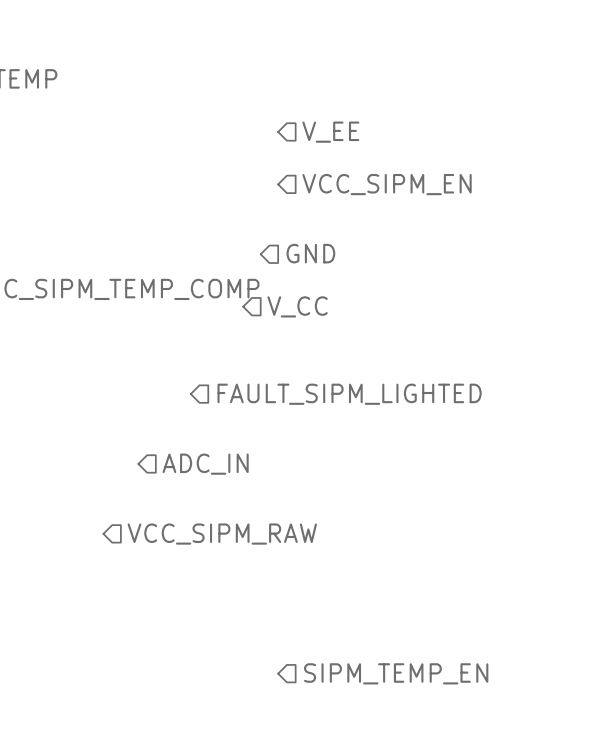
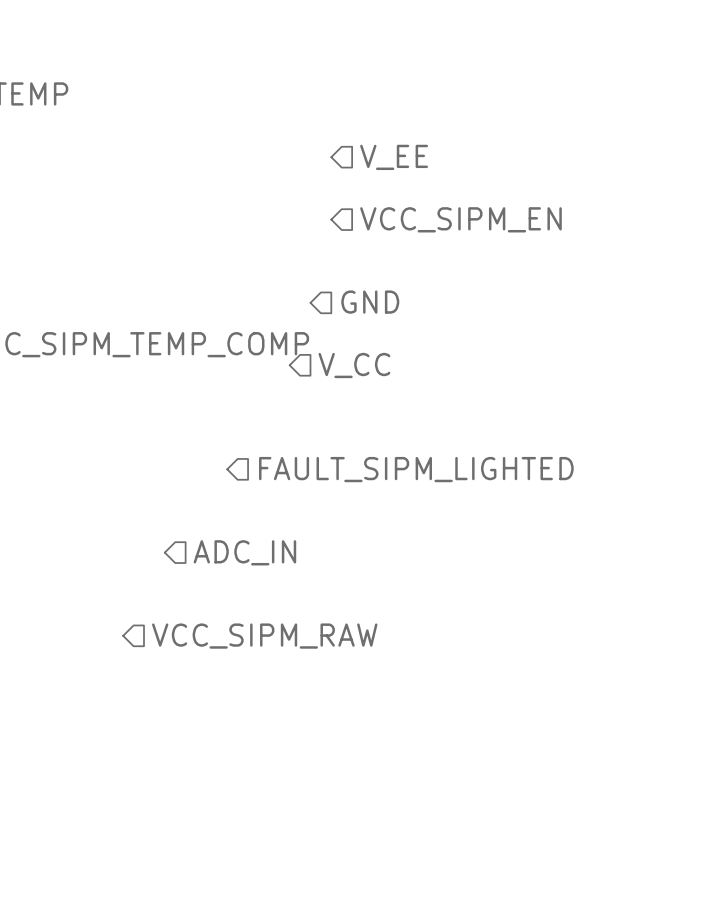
hierarchical label: SIPM_TEMP_EN (396, 673) -> none

